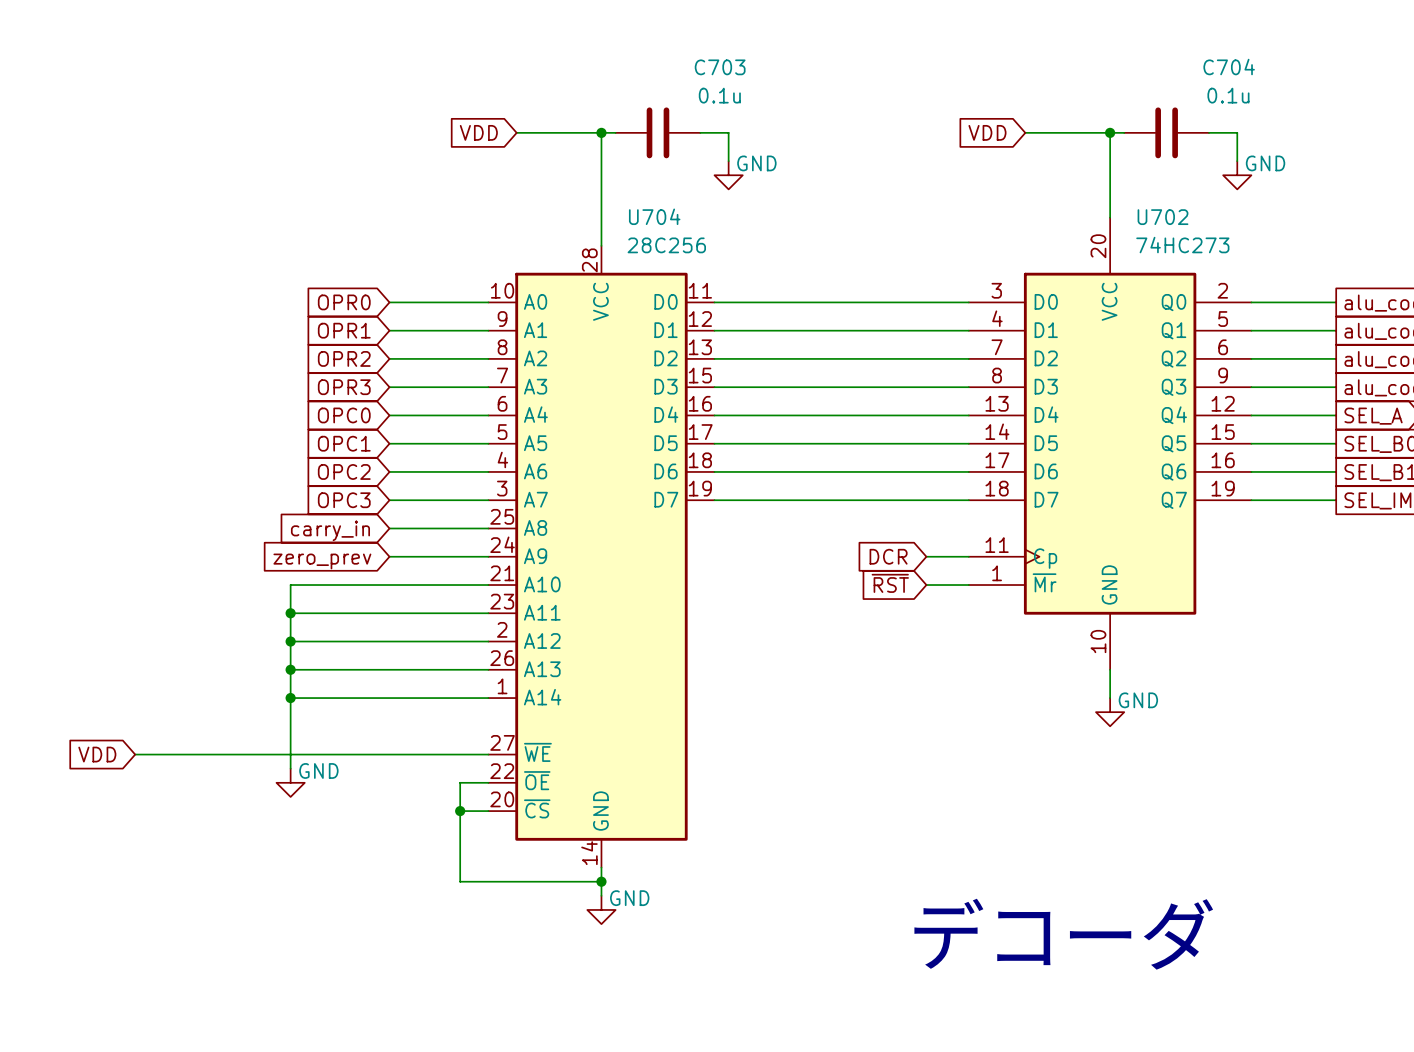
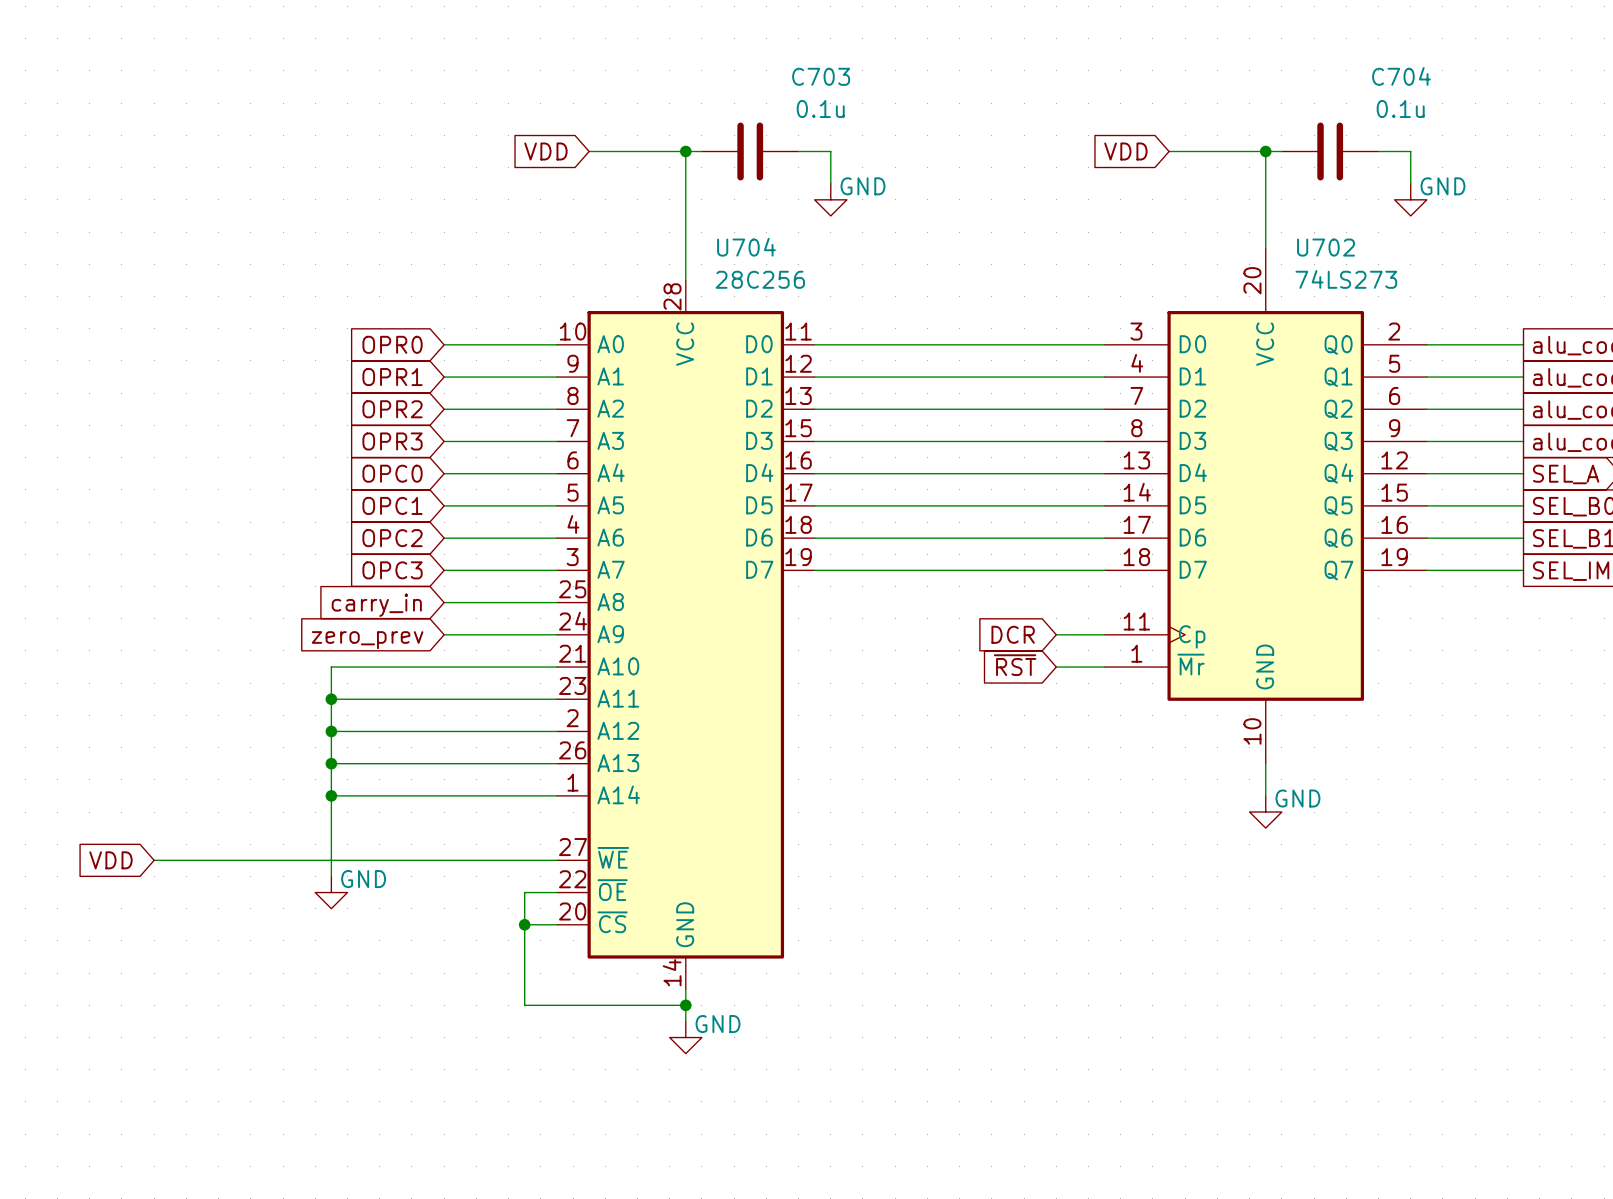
U702 value: 74HC273 (1182, 245) -> 74LS273 (1346, 279)
text: デコーダ (1063, 934) -> none

